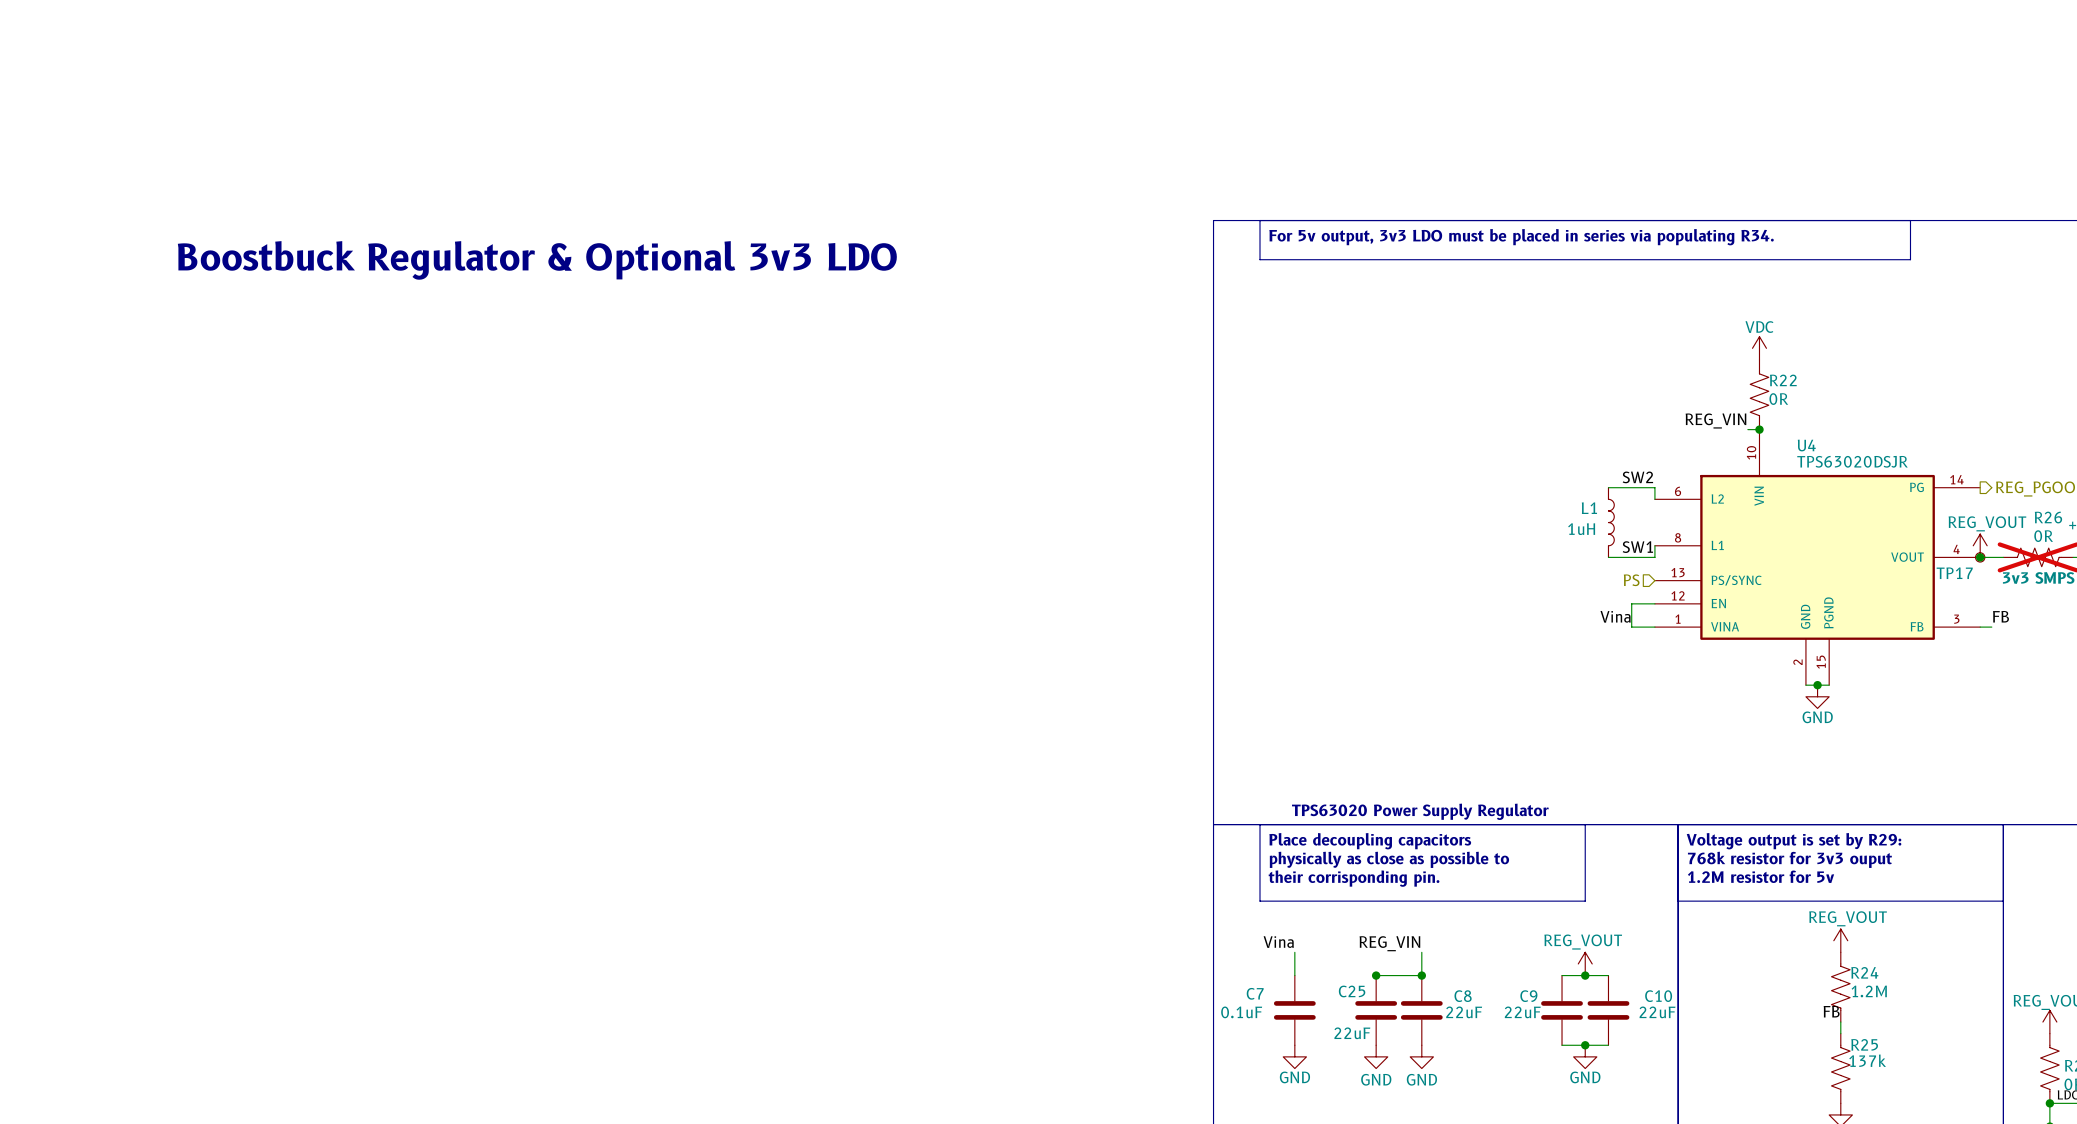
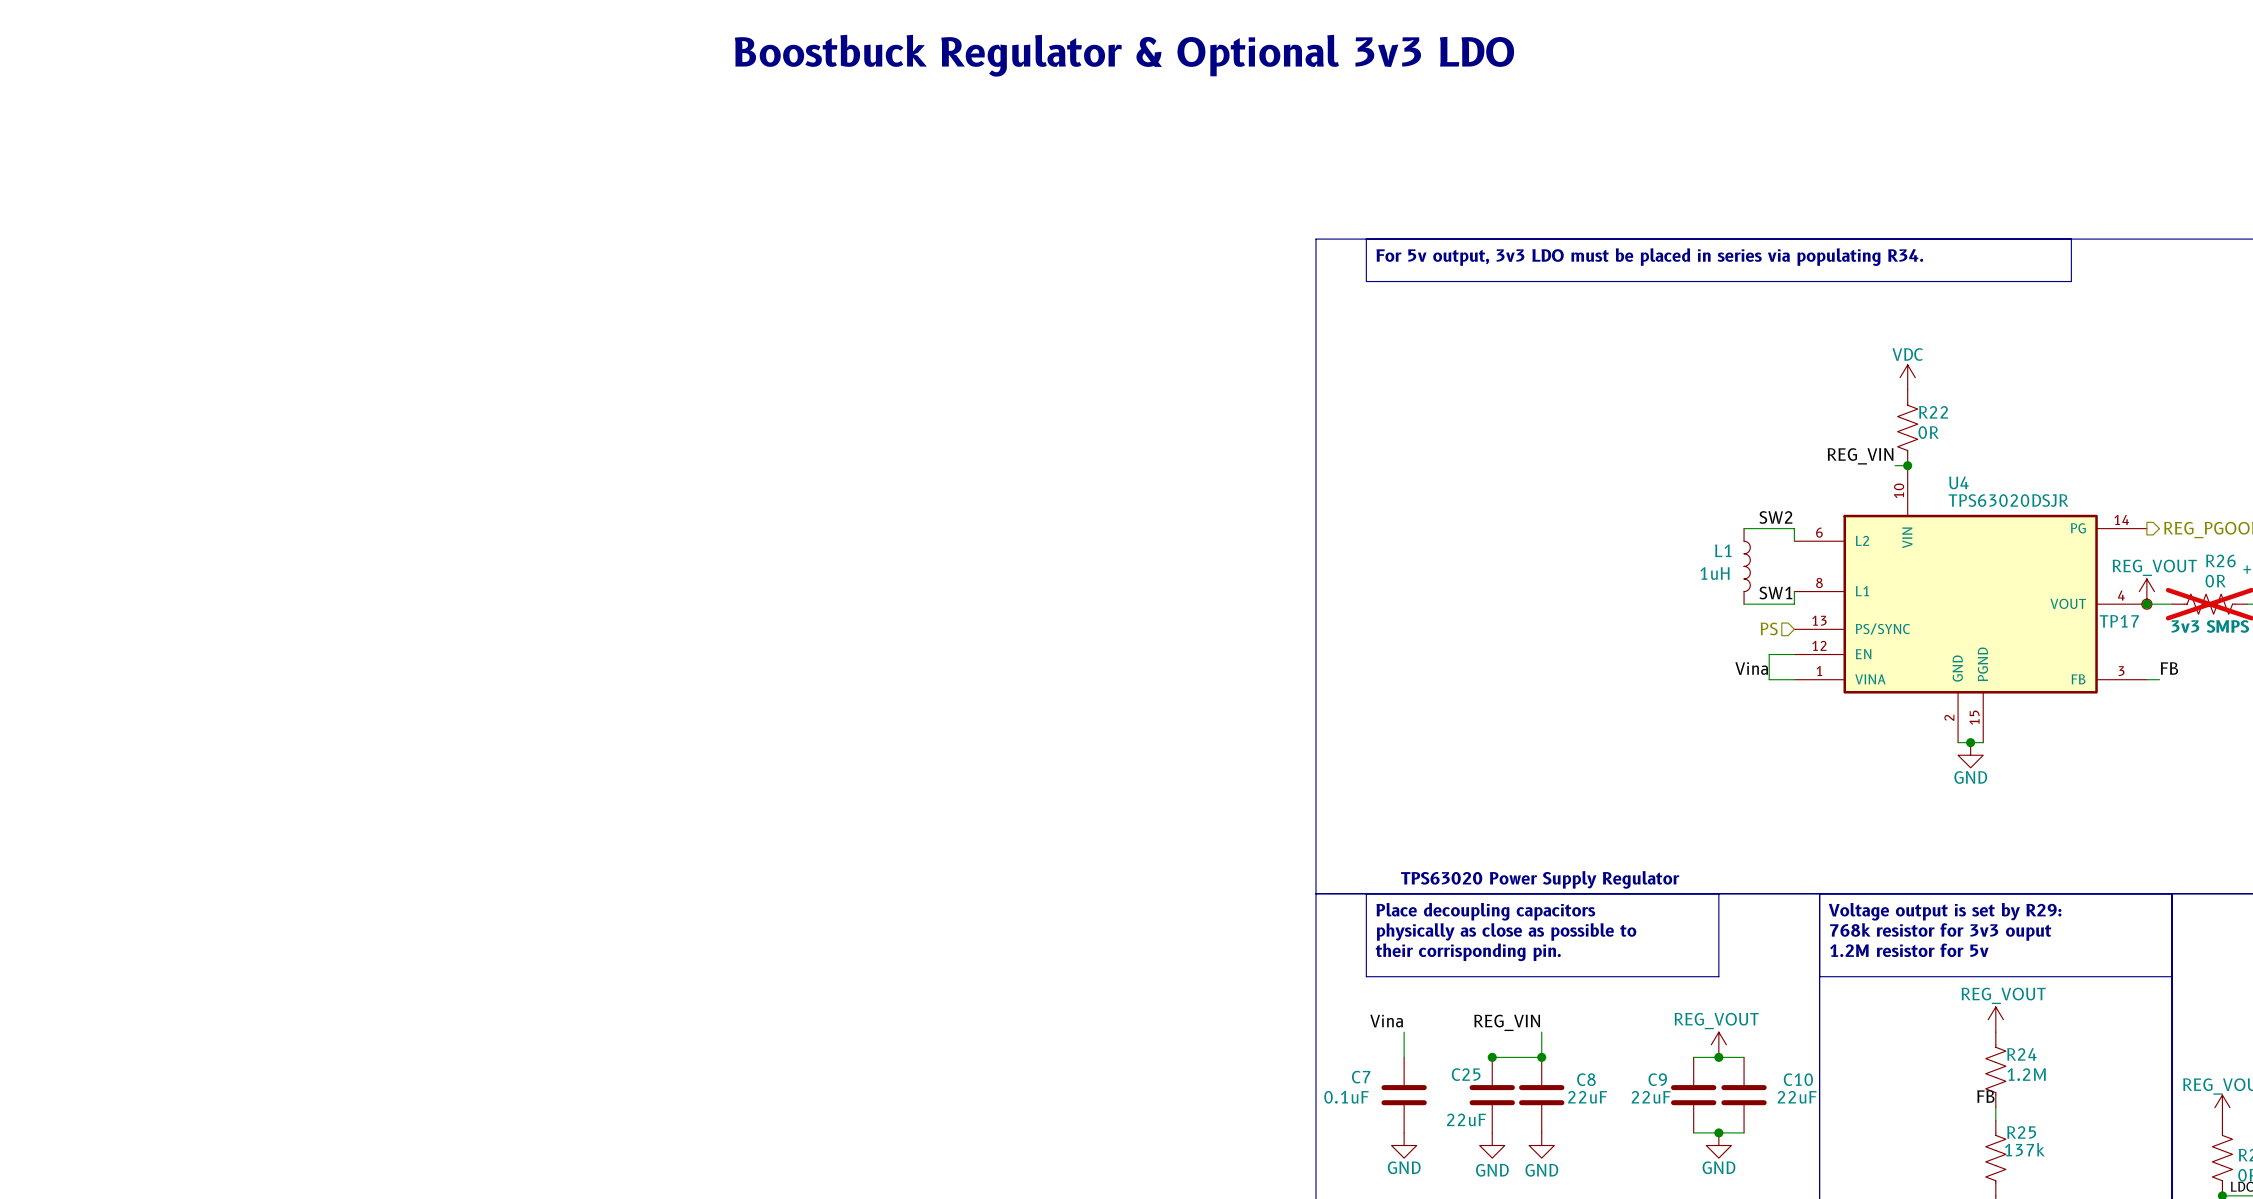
text: none -> Boostbuck Regulator & Optional 3v3 LDO (1124, 55)
text: Boostbuck Regulator & Optional 3v3 LDO (537, 260) -> none

